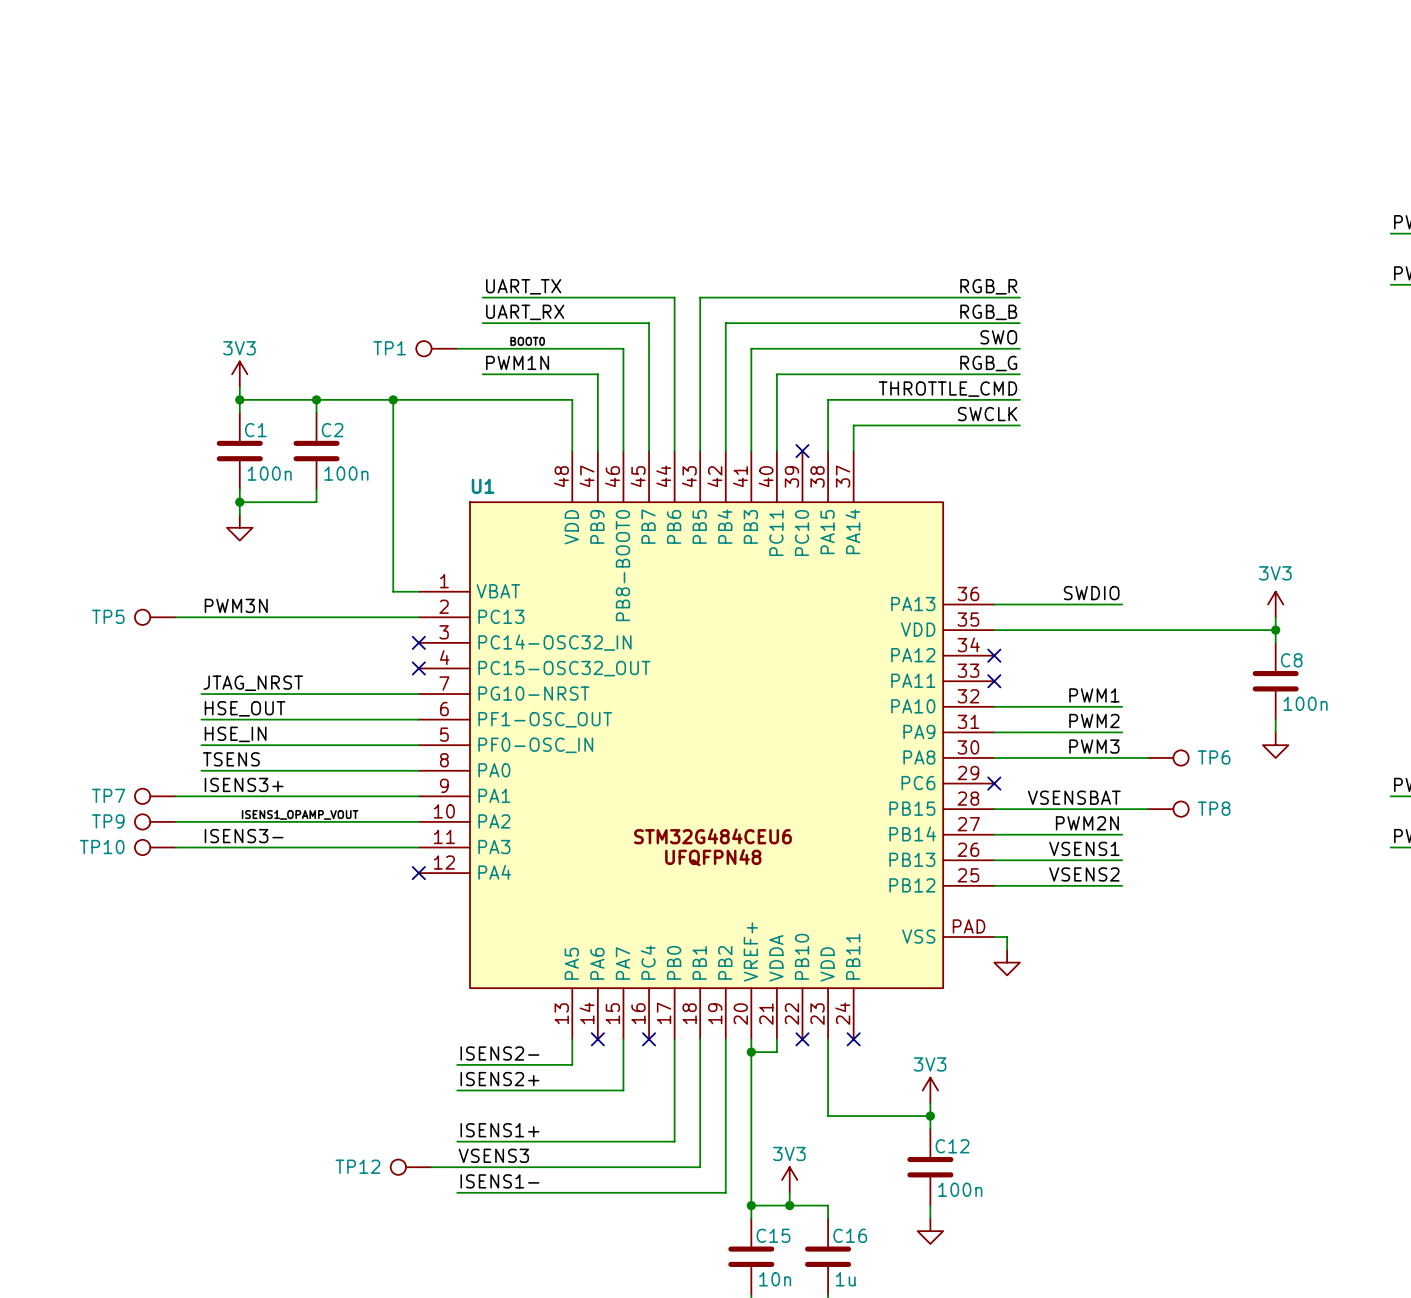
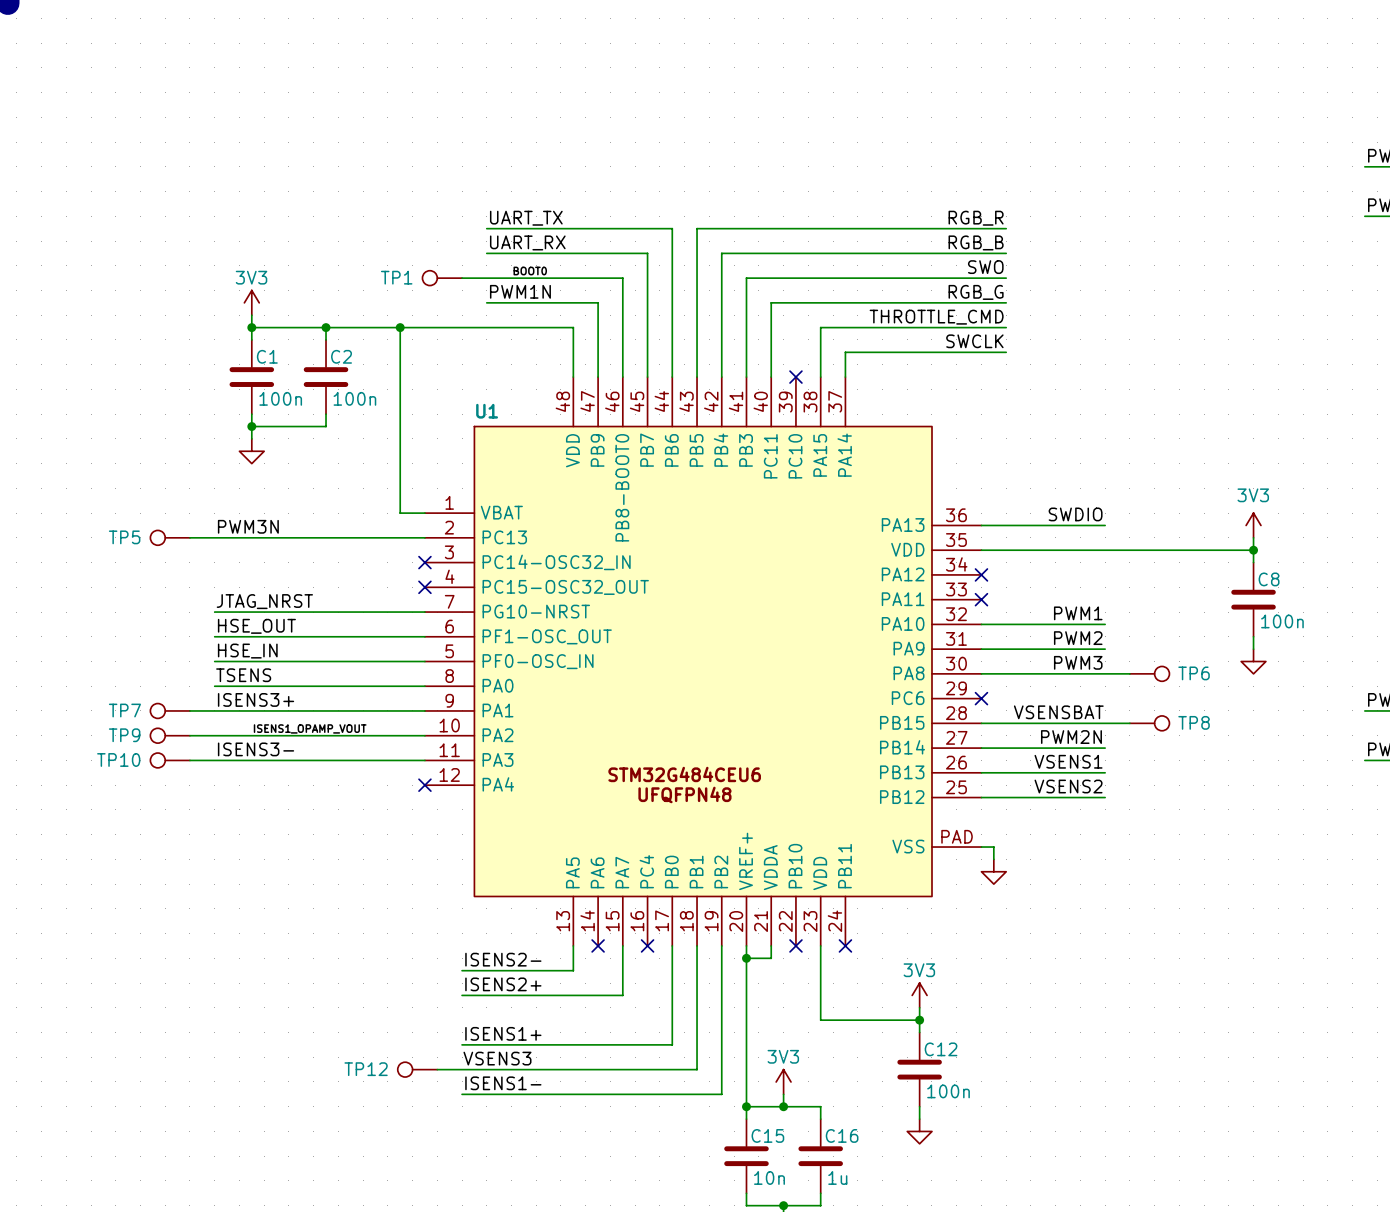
U1 text position: STM32G484CEU6 (712, 836) -> STM32G484CEU6 (684, 774)
U1 text position: UFQFPN48 (713, 857) -> UFQFPN48 (684, 794)

